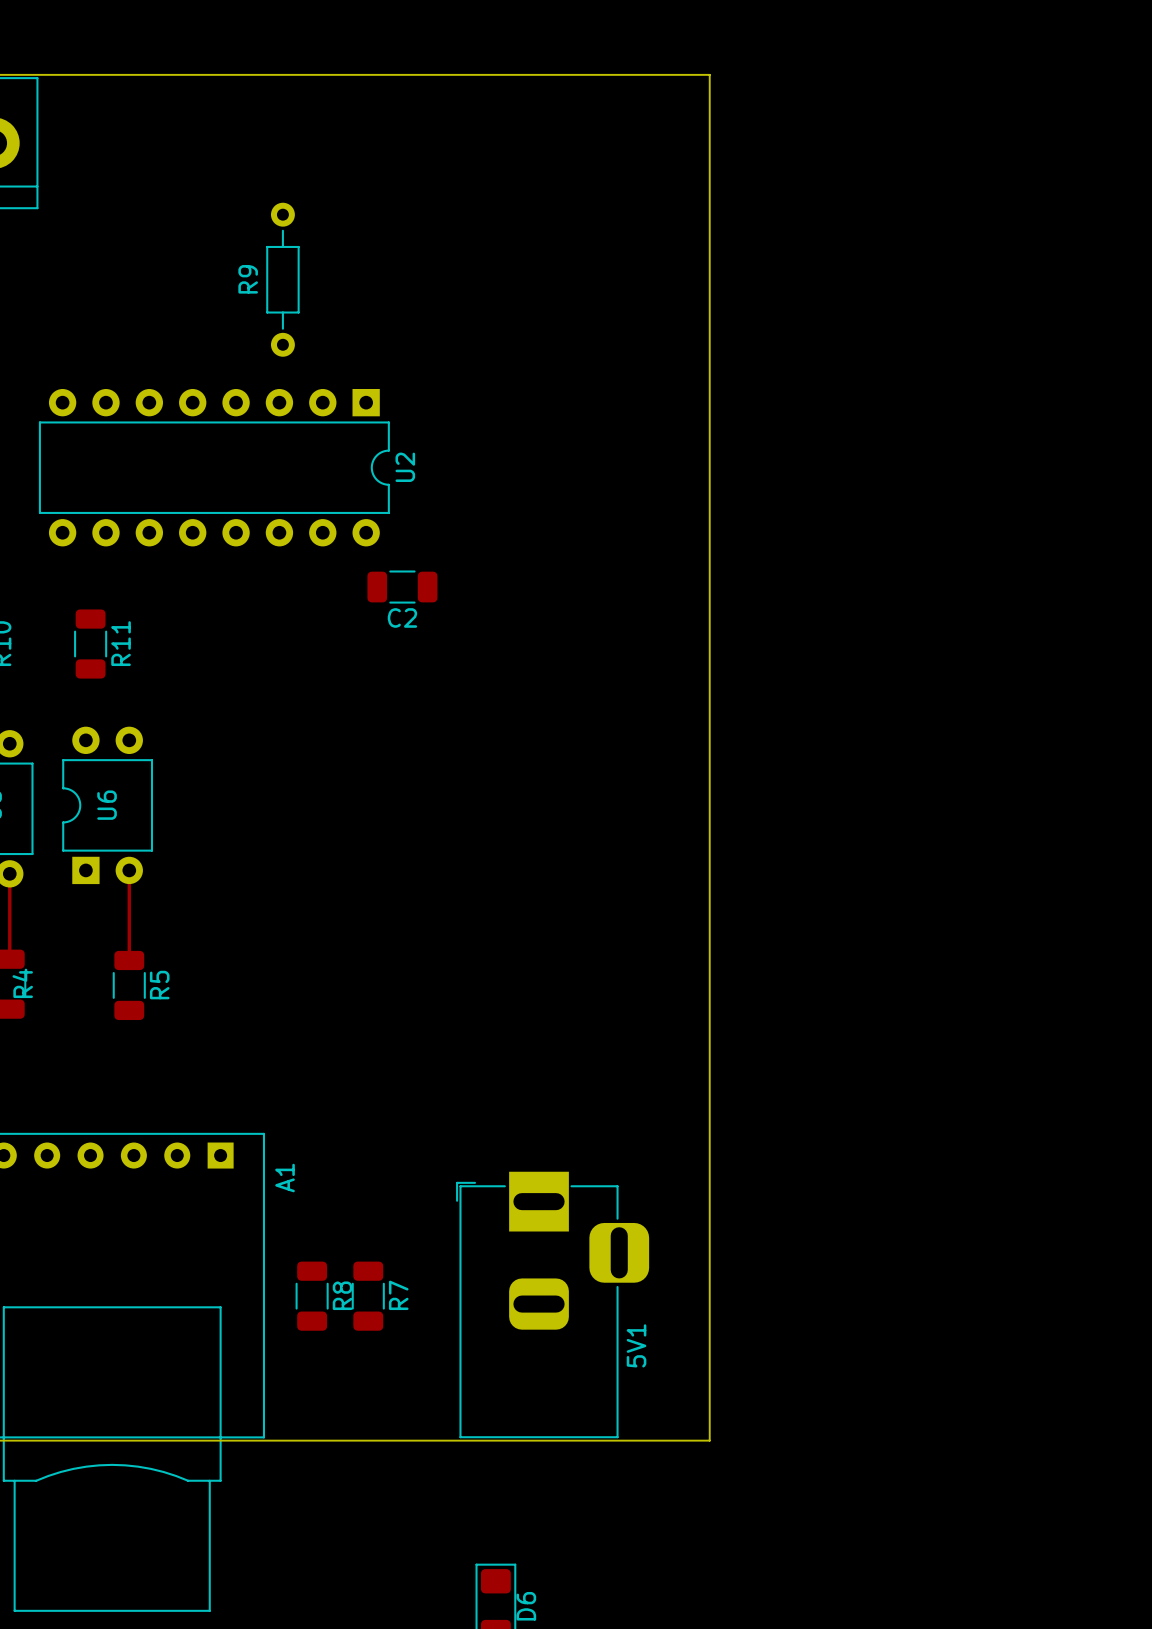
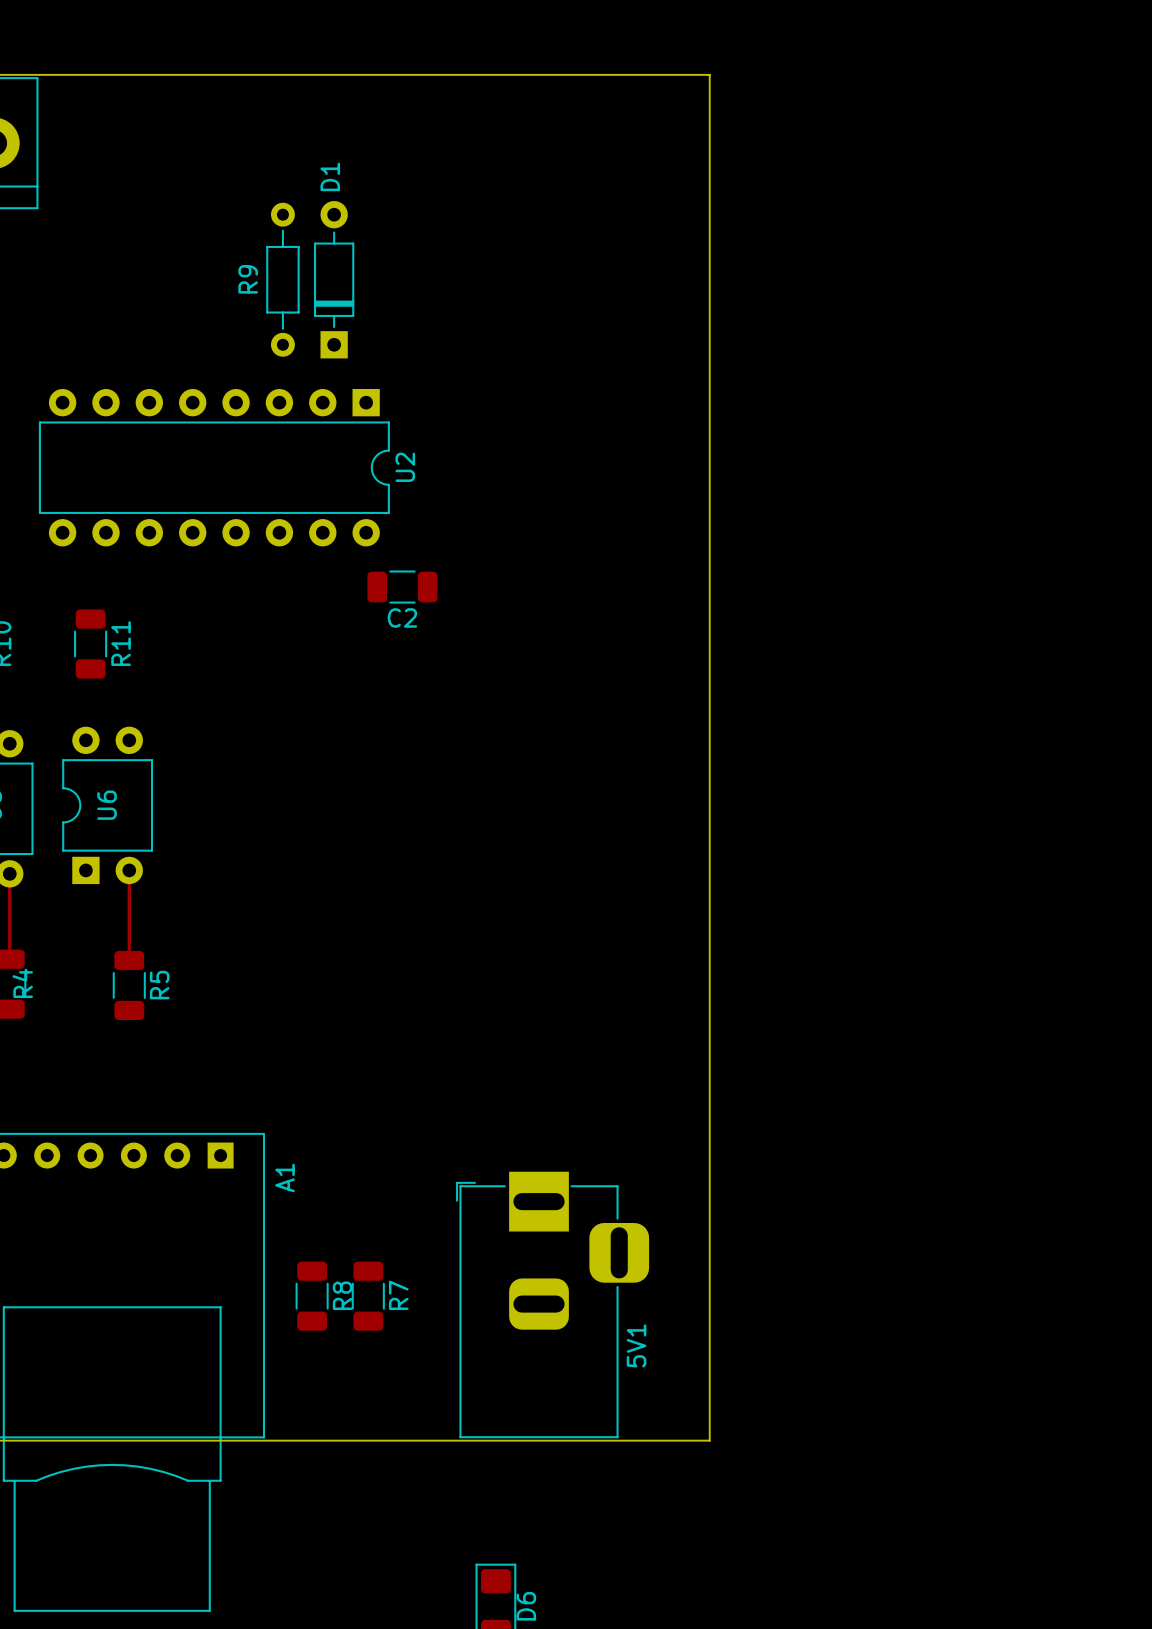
D1: none -> (334, 279)

